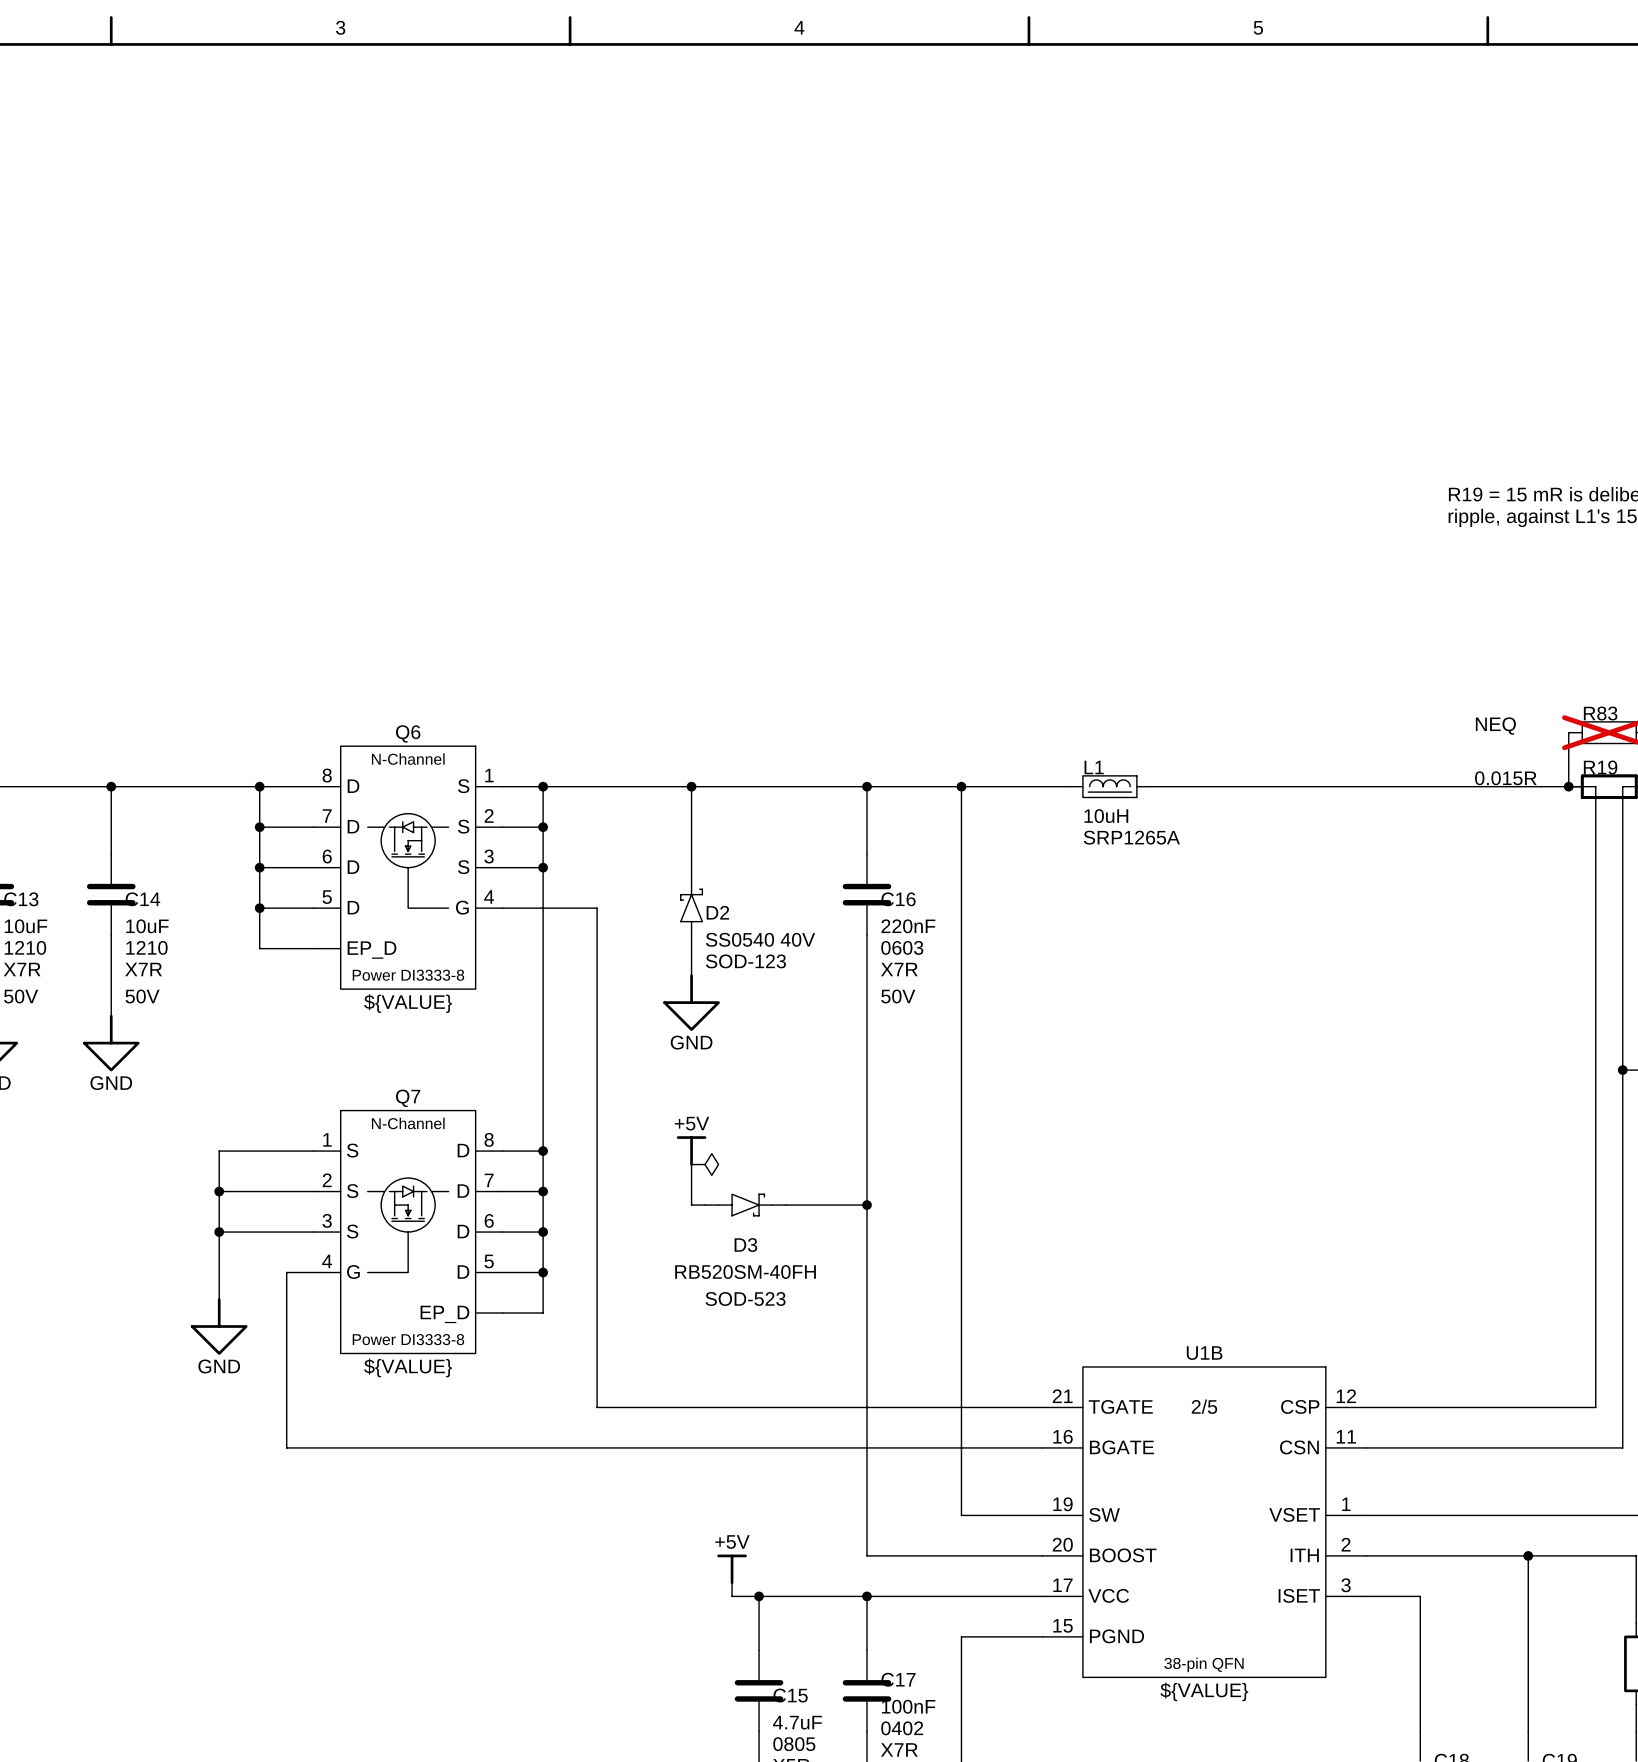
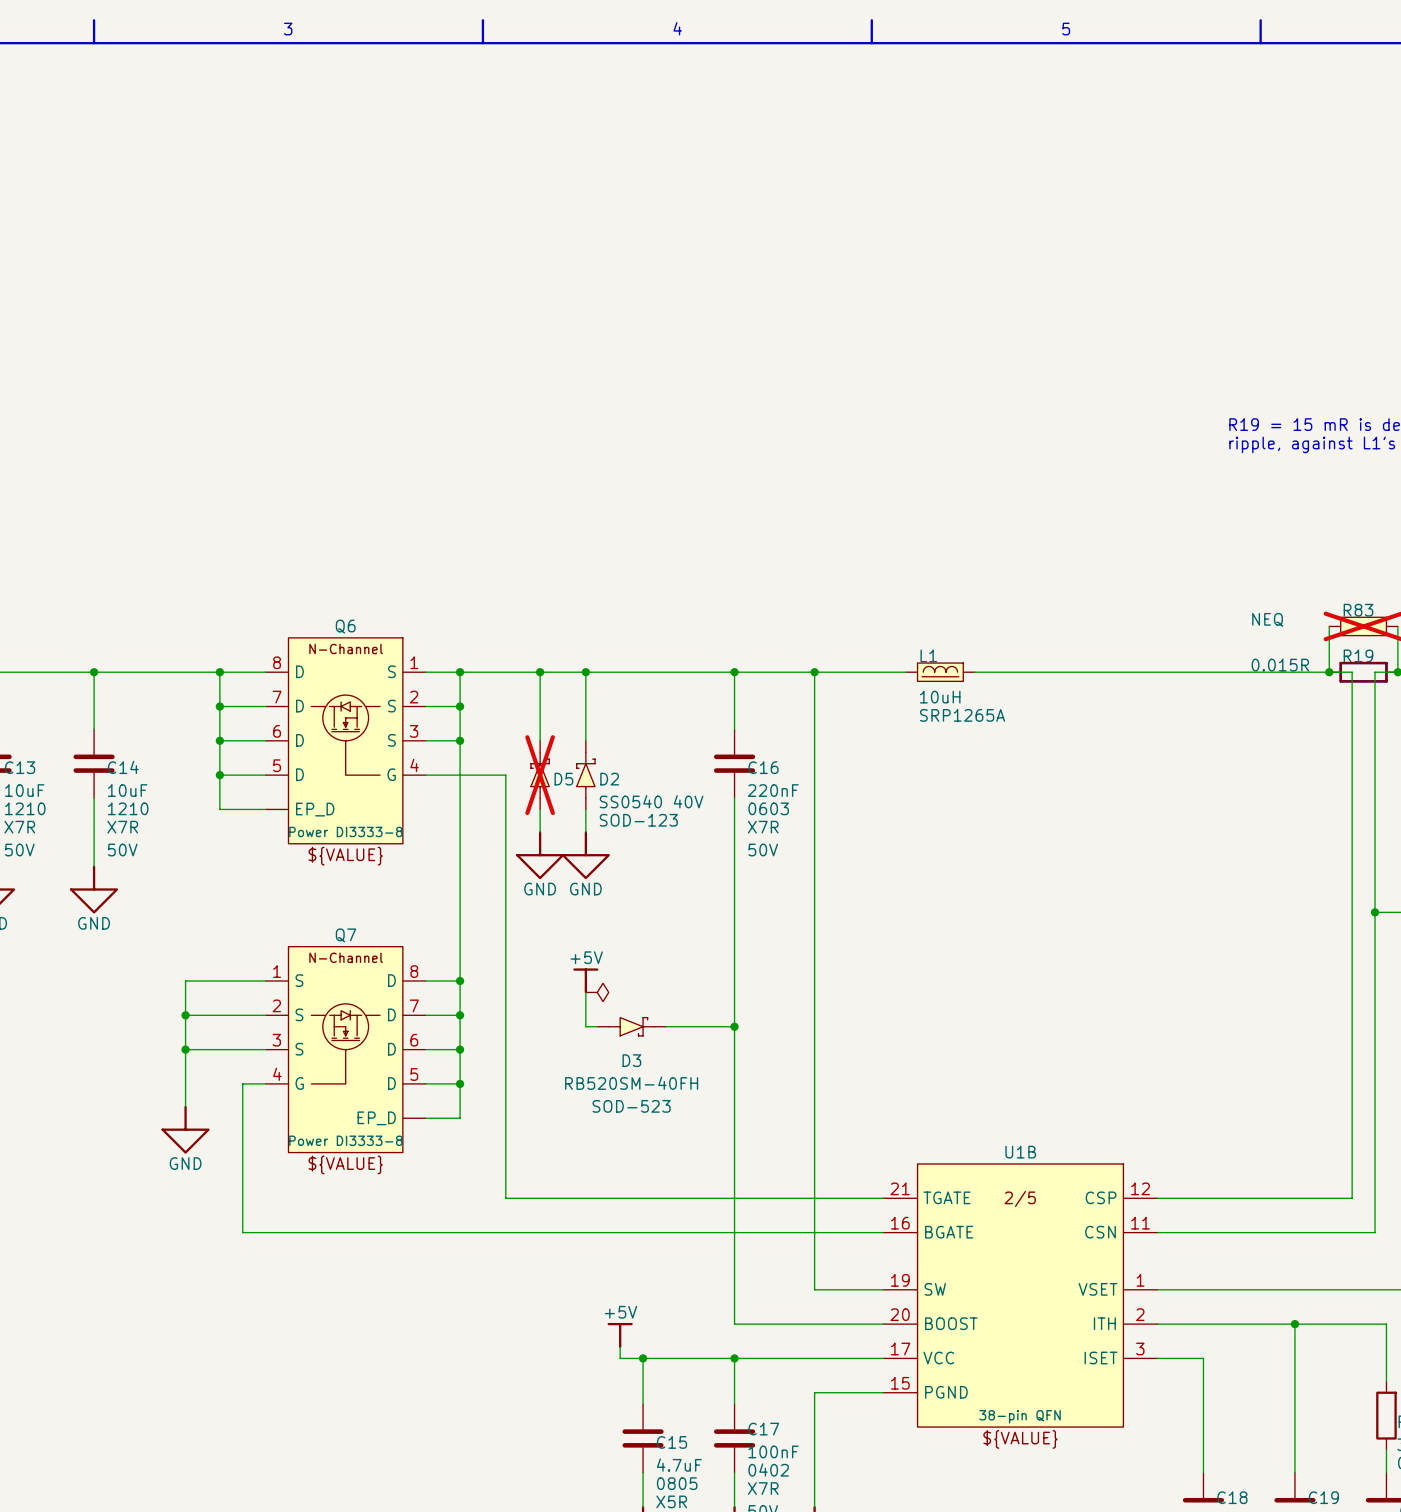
wire: none -> (540, 672) (540, 740)
junction: none -> (540, 672)
D5: none -> (540, 775)
wire: none -> (540, 809) (540, 832)
power symbol: none -> GND (540, 855)

